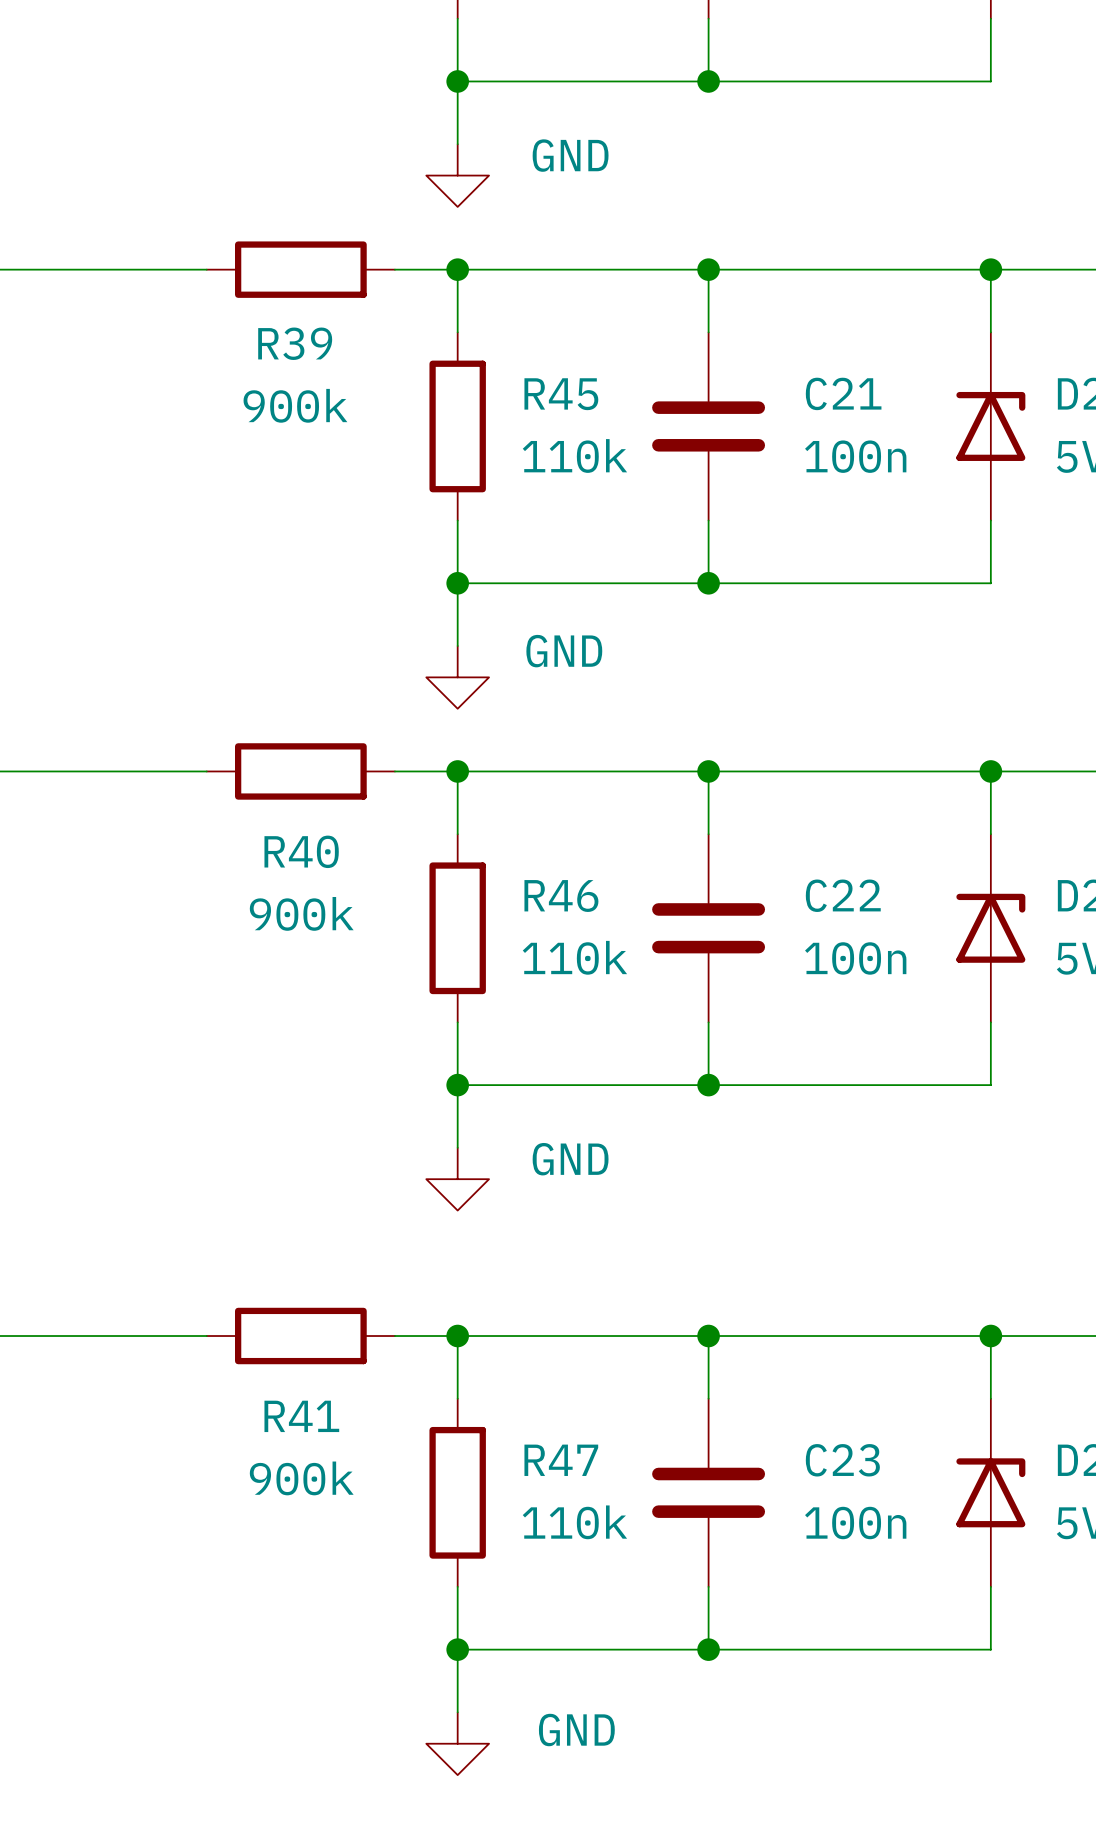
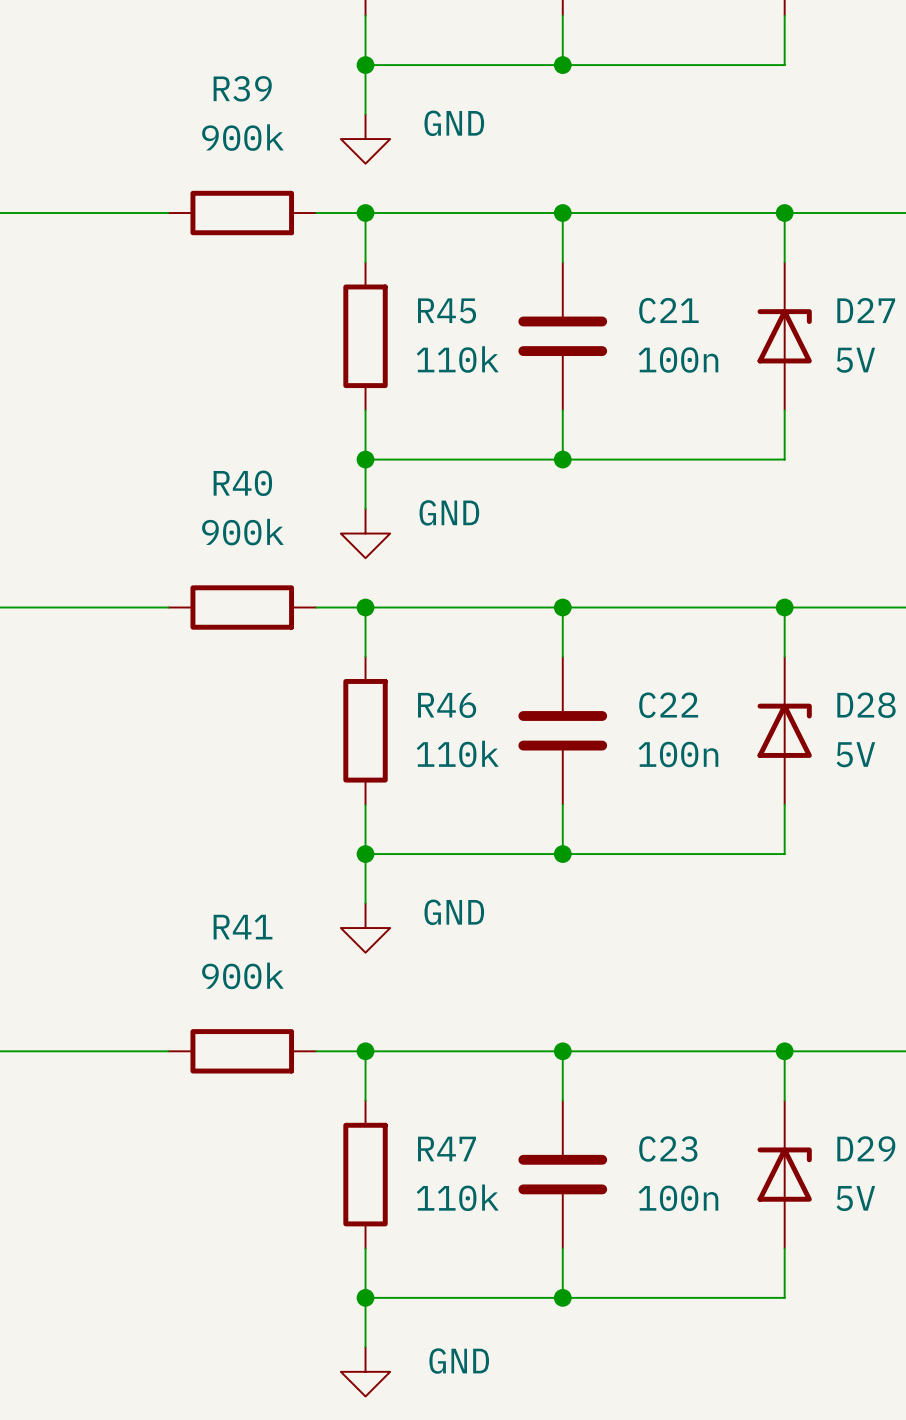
R39 name position: R39 (295, 343) -> R39 (242, 88)
R39 value position: 900k (295, 405) -> 900k (242, 137)
R40 name position: R40 (301, 851) -> R40 (242, 483)
R40 value position: 900k (301, 913) -> 900k (242, 532)
R41 name position: R41 (301, 1416) -> R41 (243, 927)
R41 value position: 900k (301, 1478) -> 900k (242, 975)

